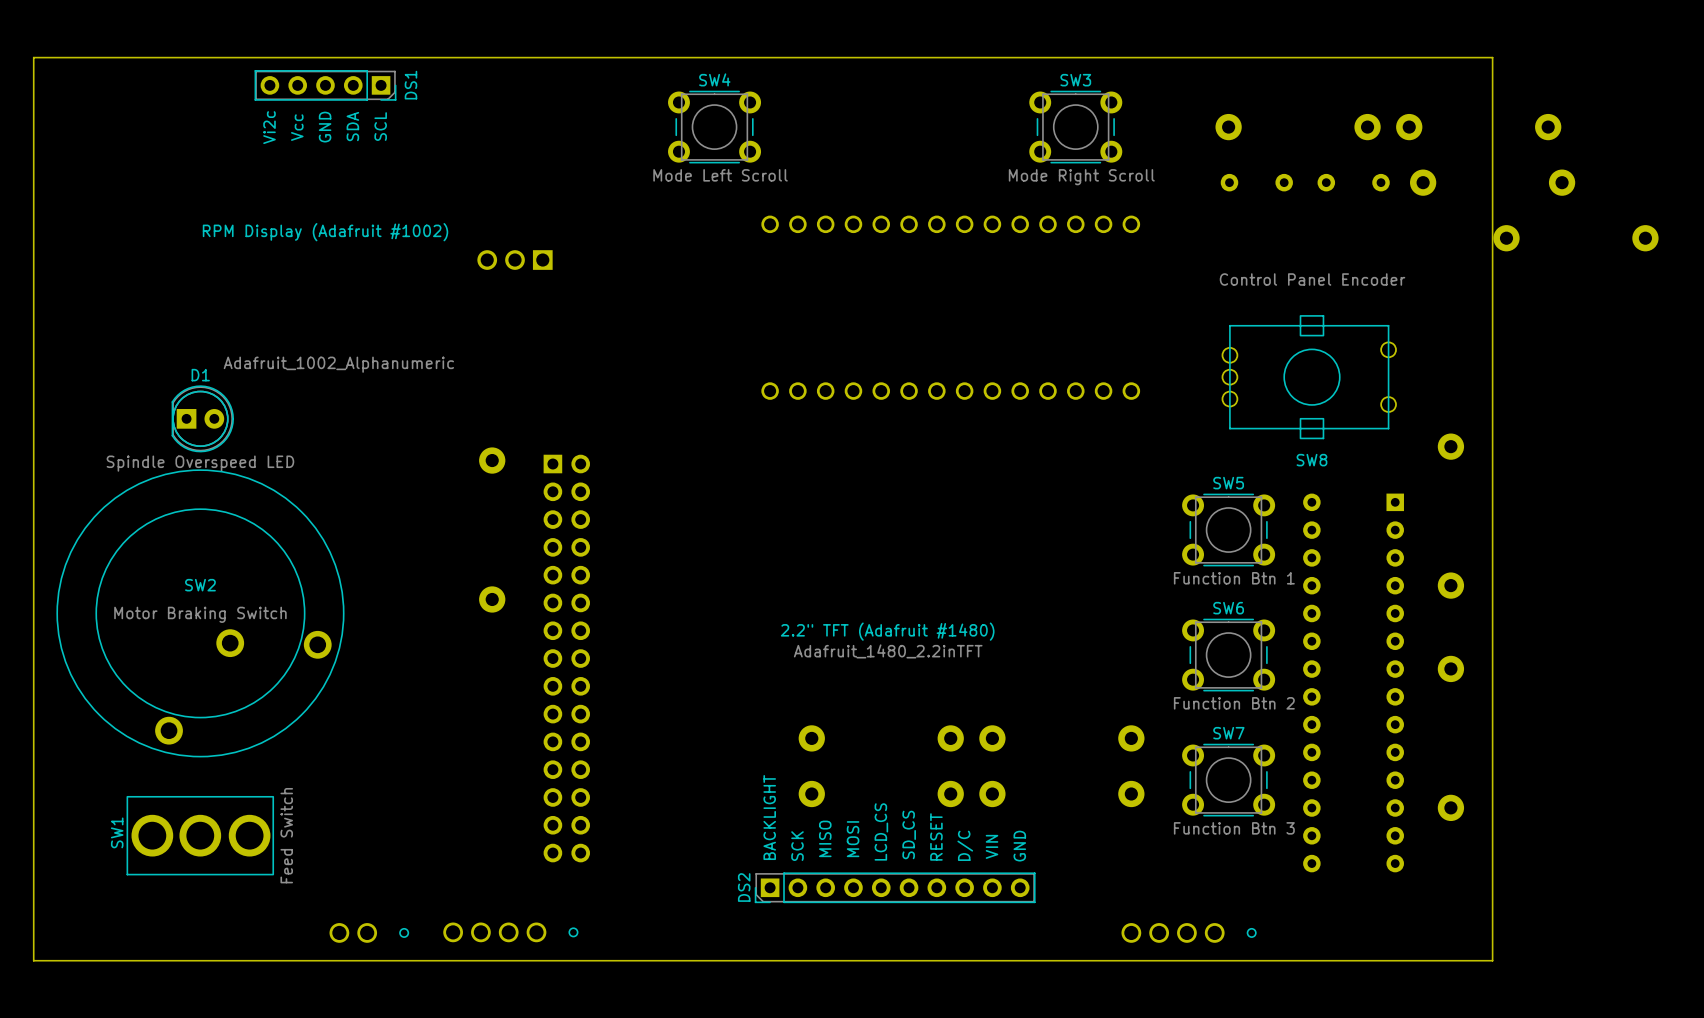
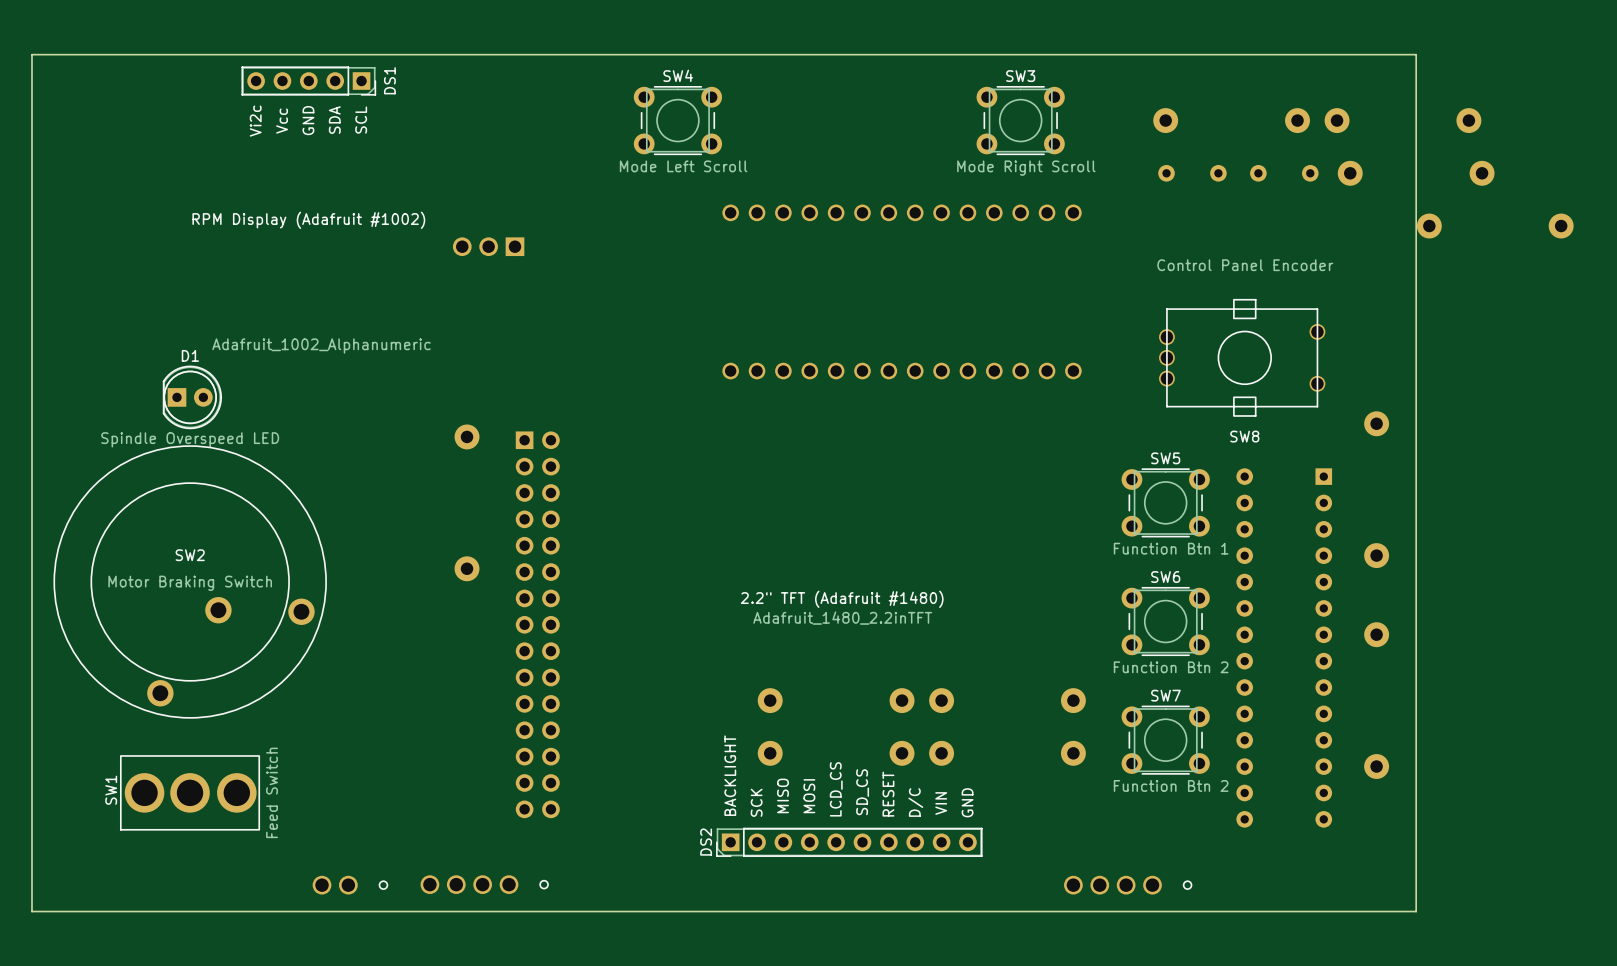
SW7 value: Function Btn 3 (1234, 828) -> Function Btn 2 (1171, 785)

